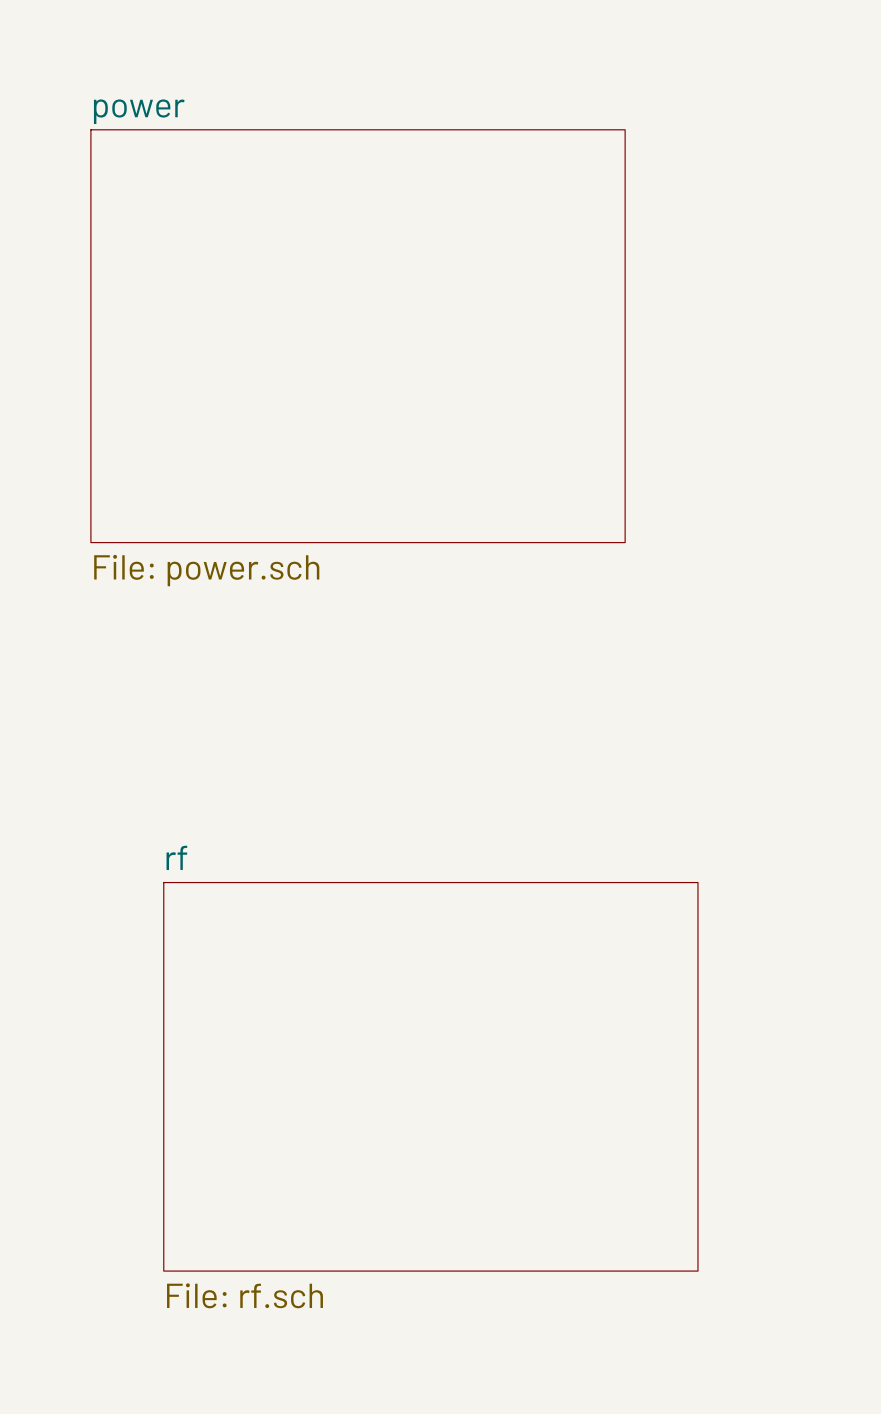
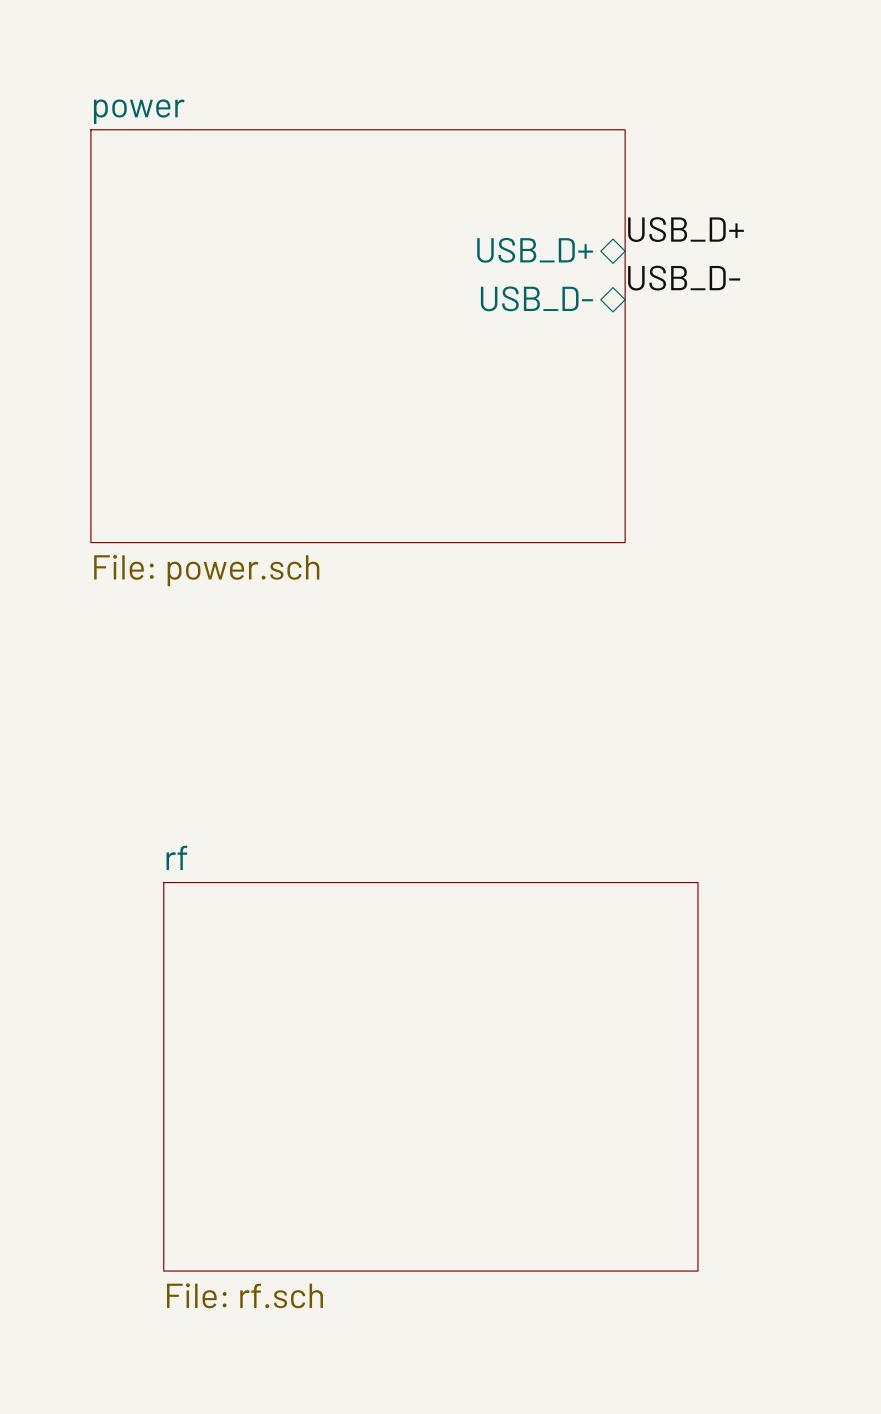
label: none -> USB_D+ (685, 229)
sheet pin: none -> USB_D+ (535, 250)
label: none -> USB_D- (684, 278)
sheet pin: none -> USB_D- (536, 298)

